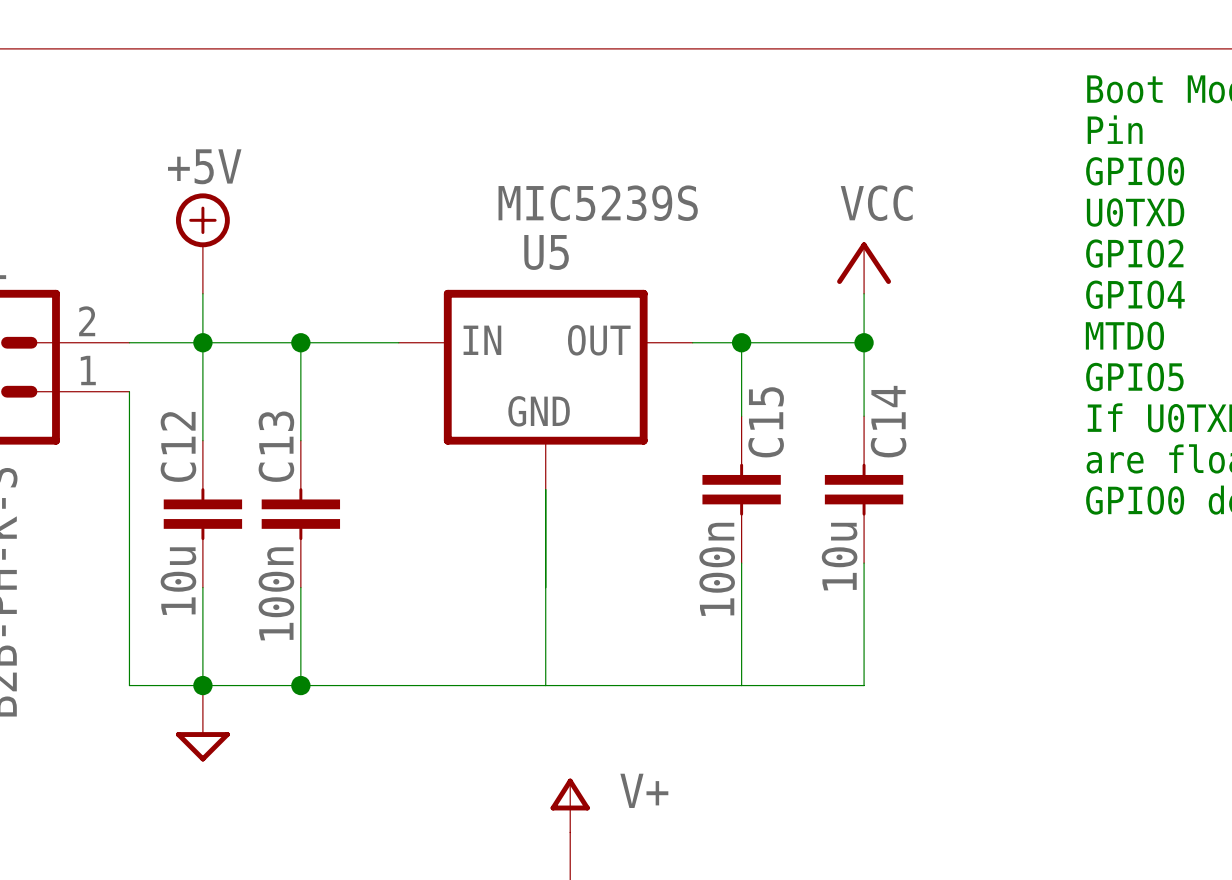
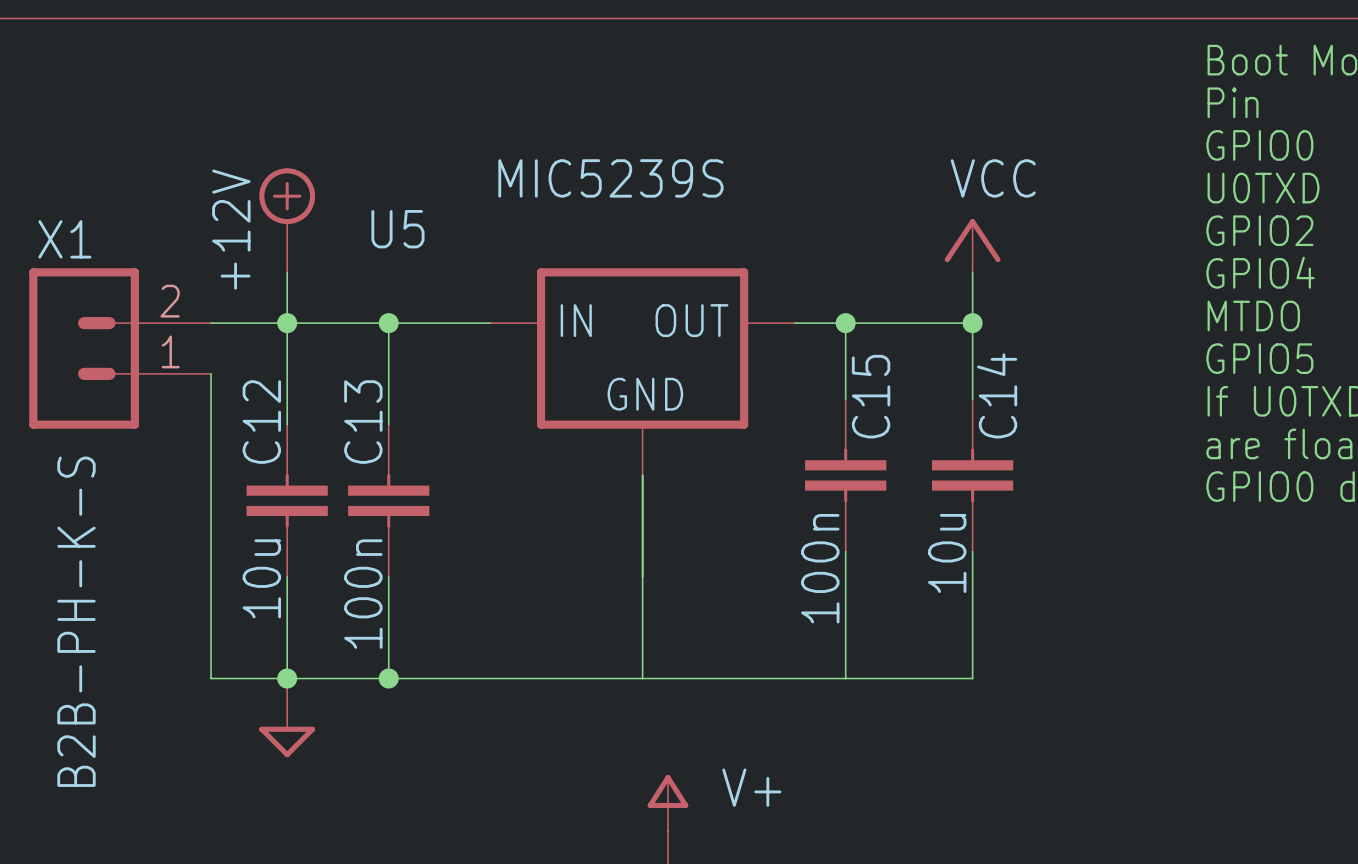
U5 value position: MIC5239S (598, 203) -> MIC5239S (610, 178)
power symbol: +5V (202, 243) -> +12V (287, 220)
U5 name position: U5 (546, 252) -> U5 (397, 229)

